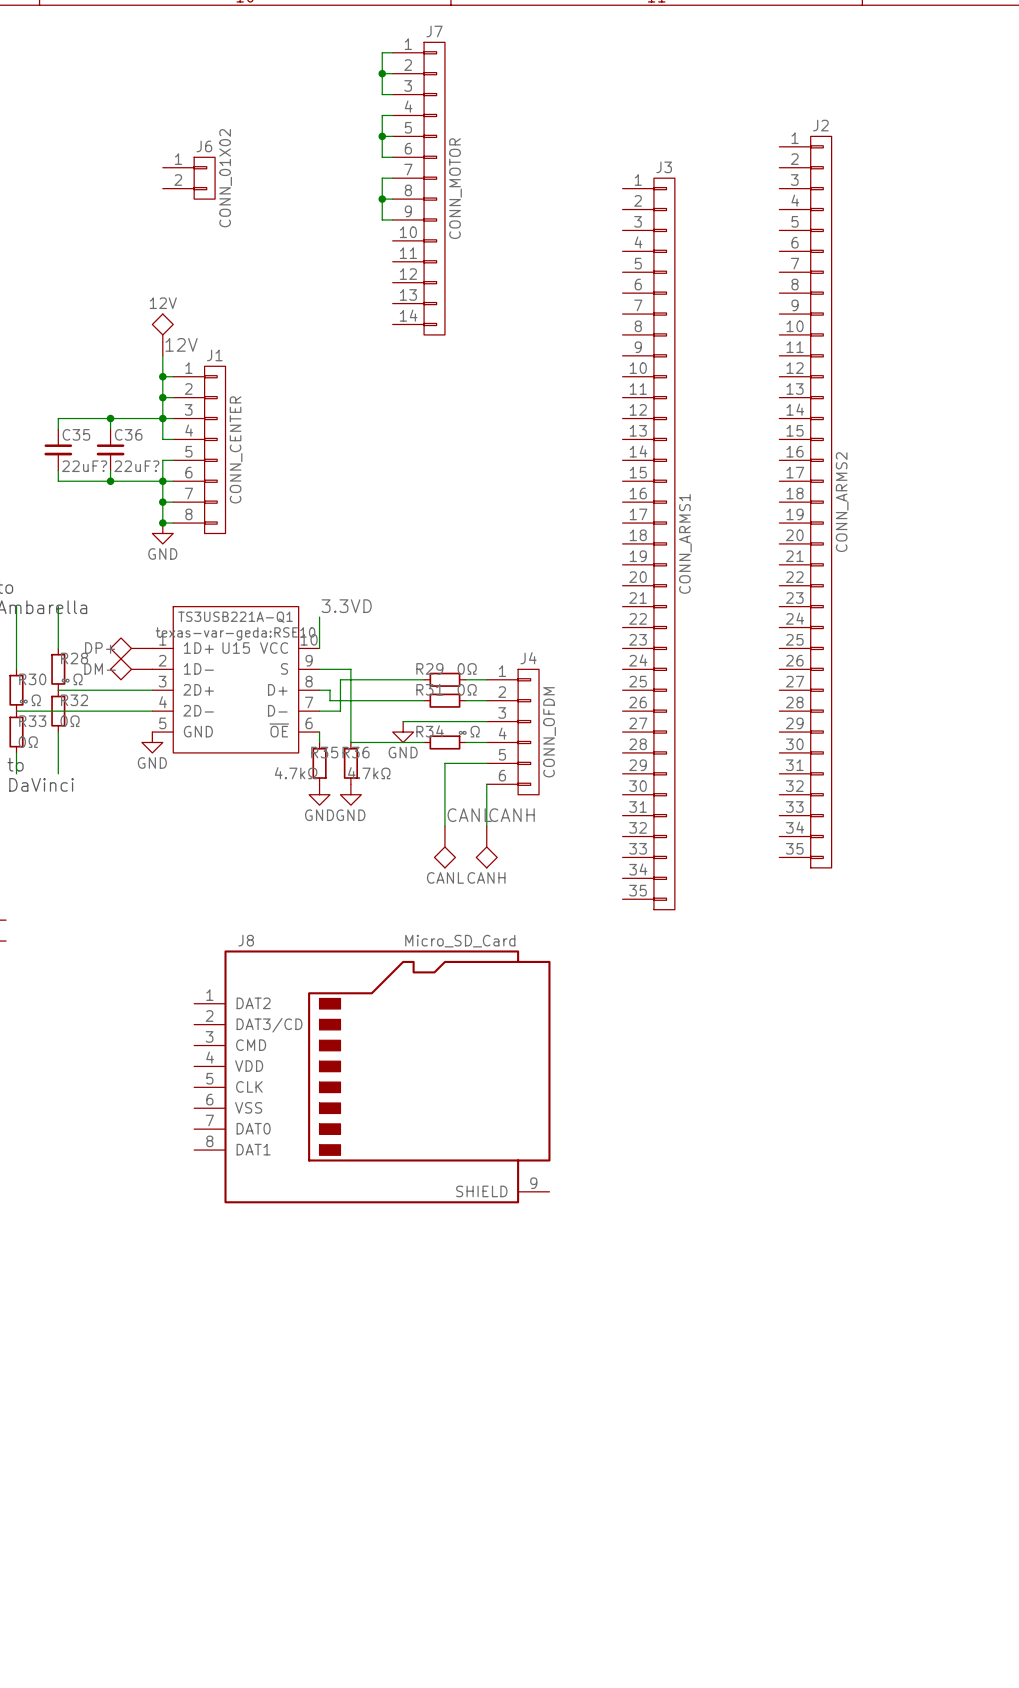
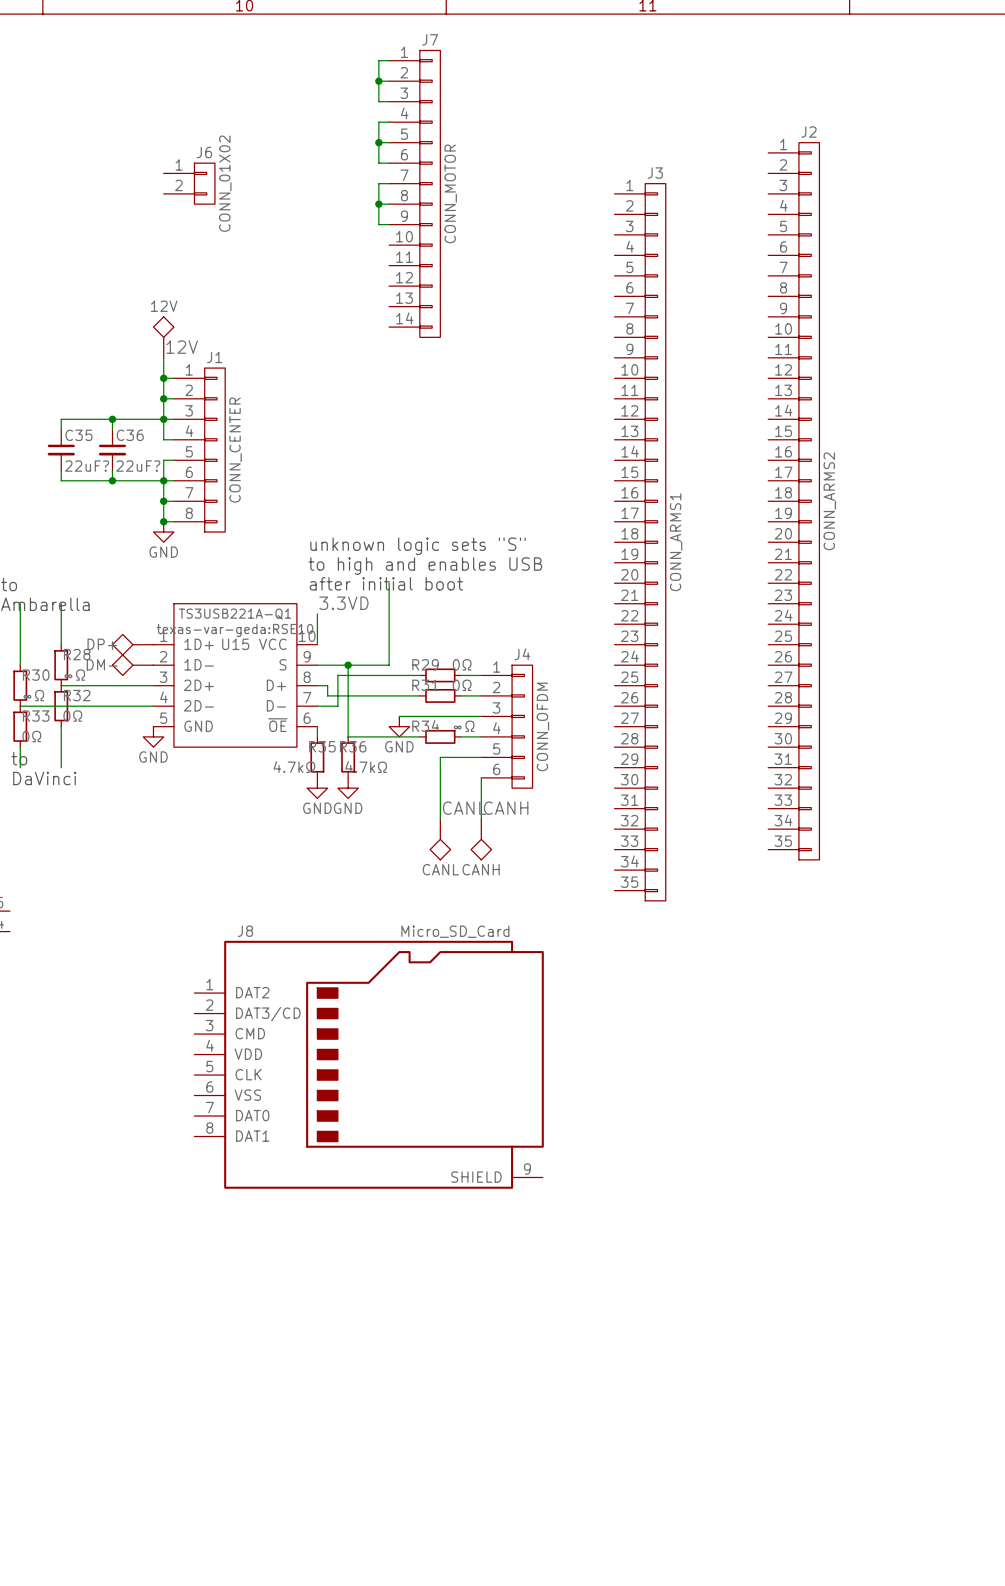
text: none -> unknown logic sets "S" (418, 546)
text: none -> to high and enables USB (425, 566)
wire: none -> (389, 583) (389, 665) (348, 665)
text: none -> after initial boot (386, 583)
junction: none -> (348, 665)

